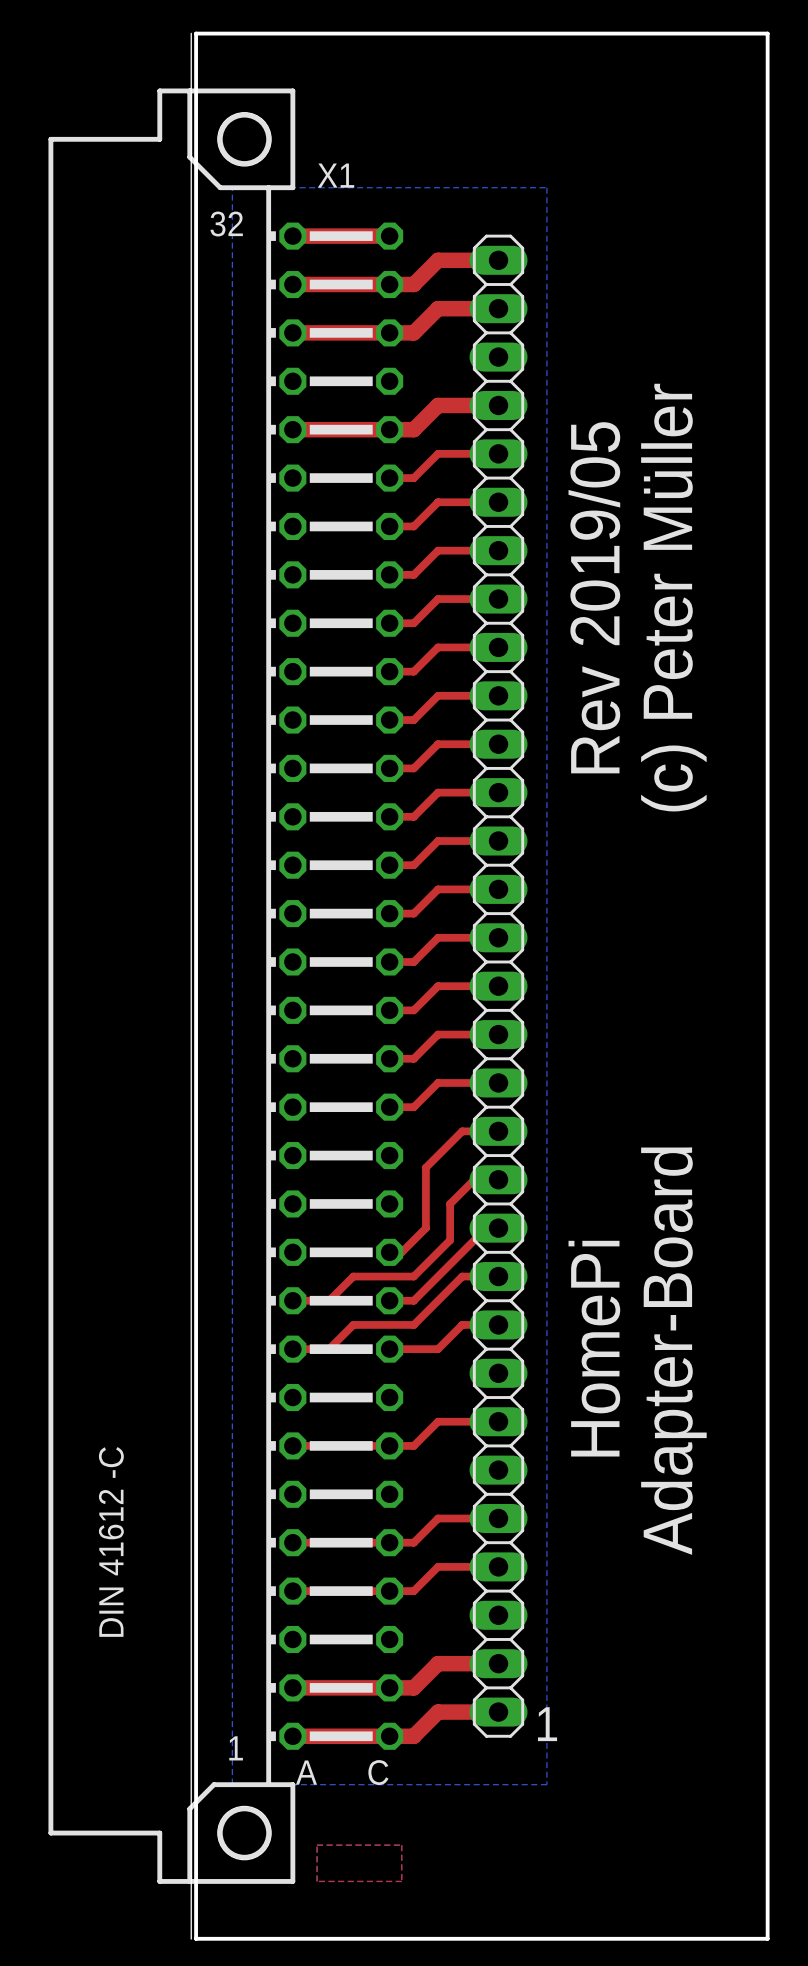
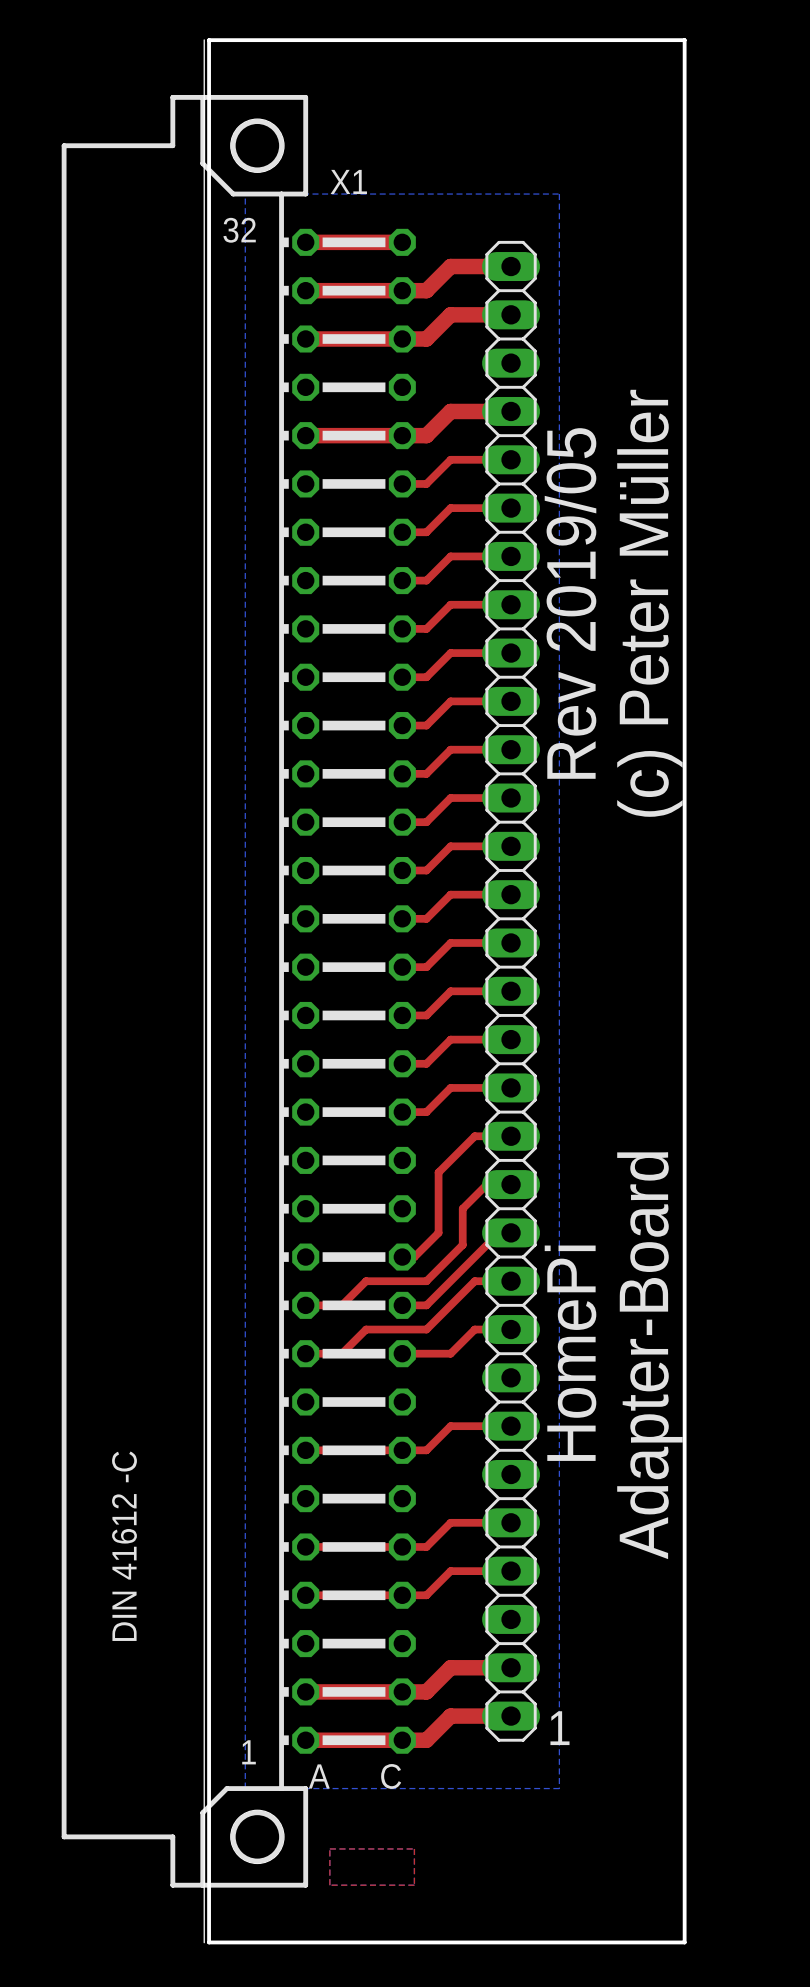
board edge: (672, 33) (767, 33) (767, 1938) (672, 1938) -> (684, 40) (684, 1942)
text position: Rev 2019/05 (594, 597) -> Rev 2019/05 (570, 603)
text position: (c) Peter Müller (673, 597) -> (c) Peter Müller (649, 603)
text position: HomePi (594, 1348) -> HomePi (570, 1353)
text position: Adapter-Board (673, 1351) -> Adapter-Board (649, 1355)

